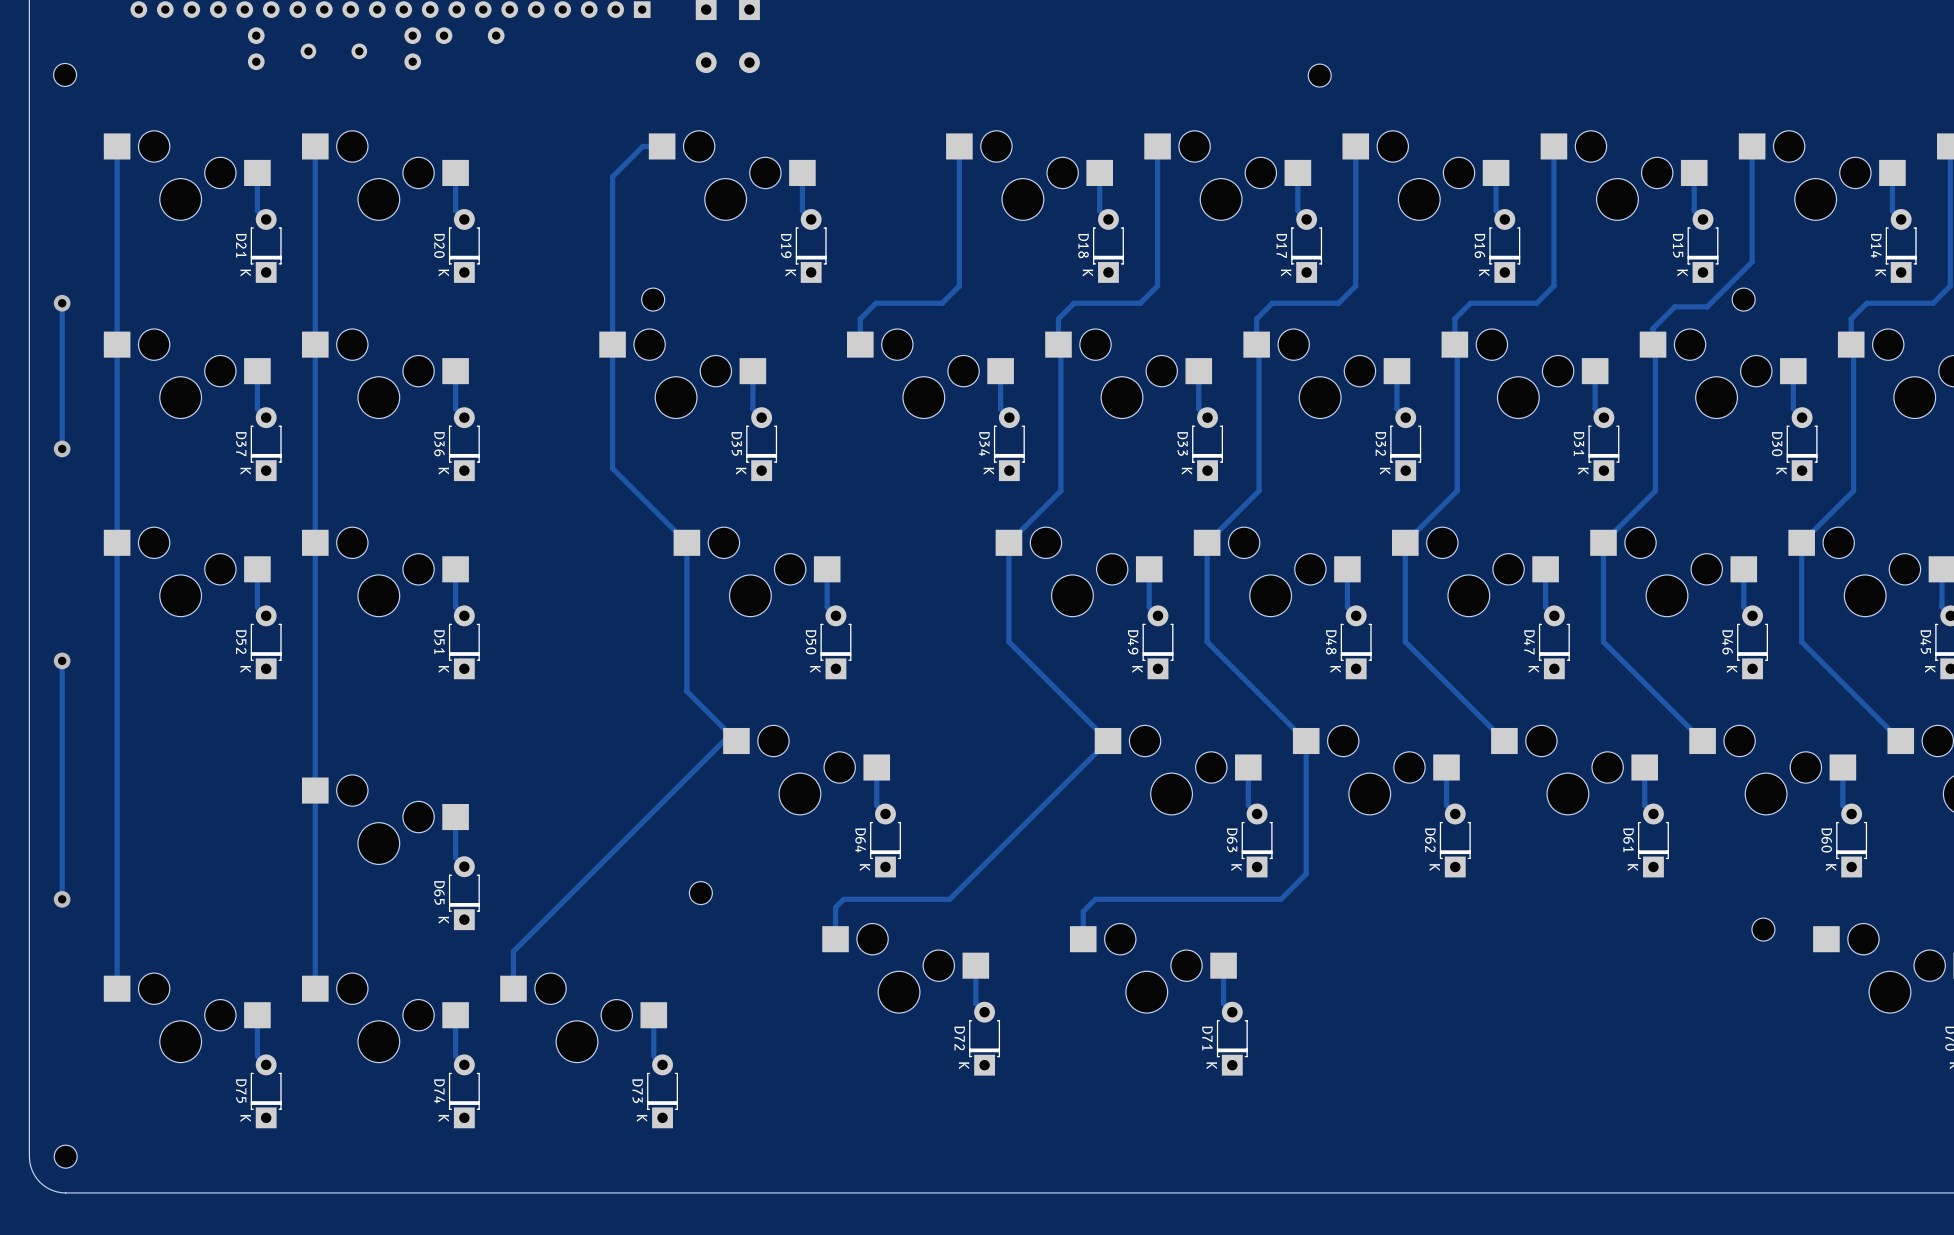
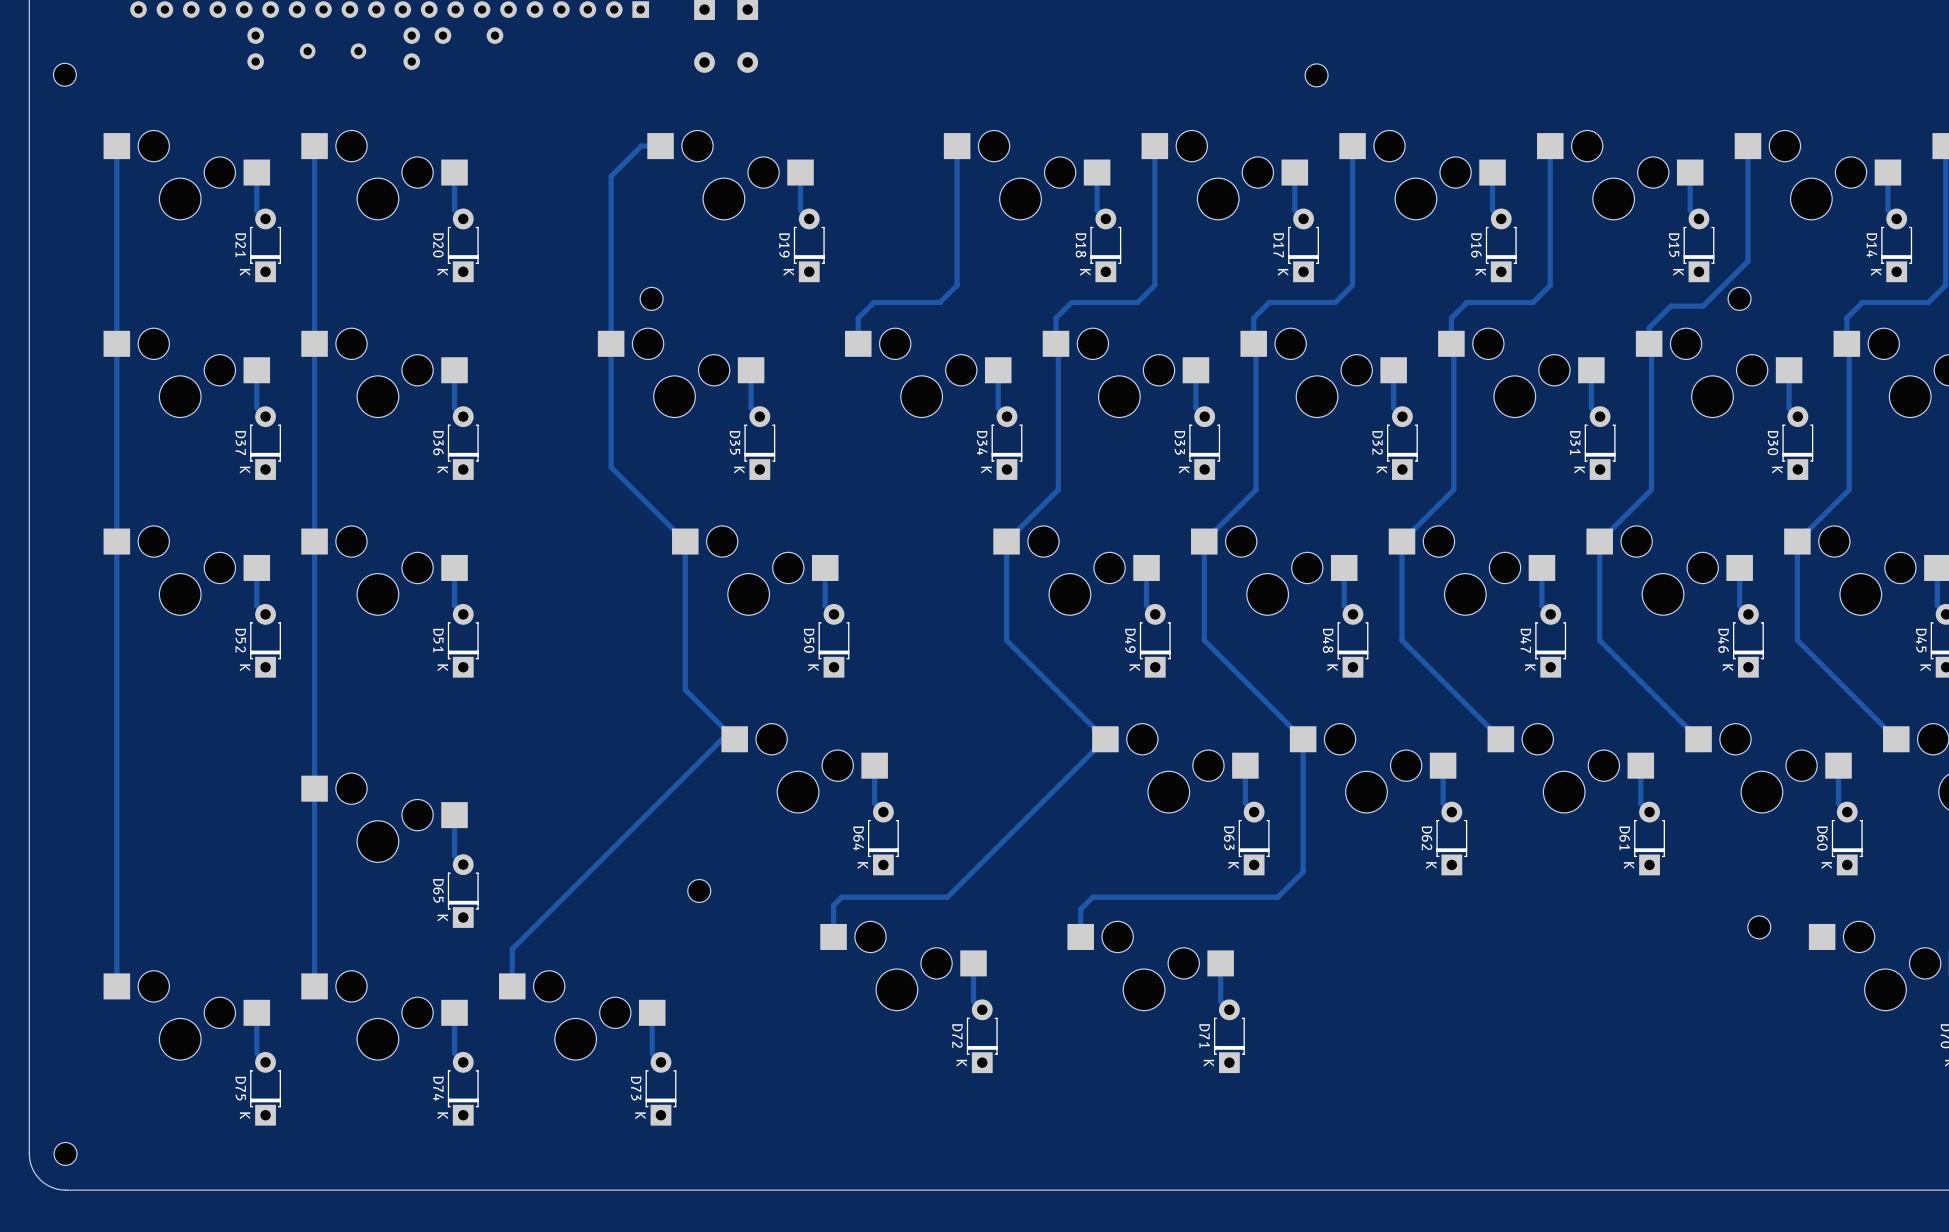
track: (62, 303) (62, 448) -> none
via: (62, 303) -> none
via: (62, 448) -> none
track: (62, 660) (62, 899) -> none
via: (62, 660) -> none
via: (62, 899) -> none

